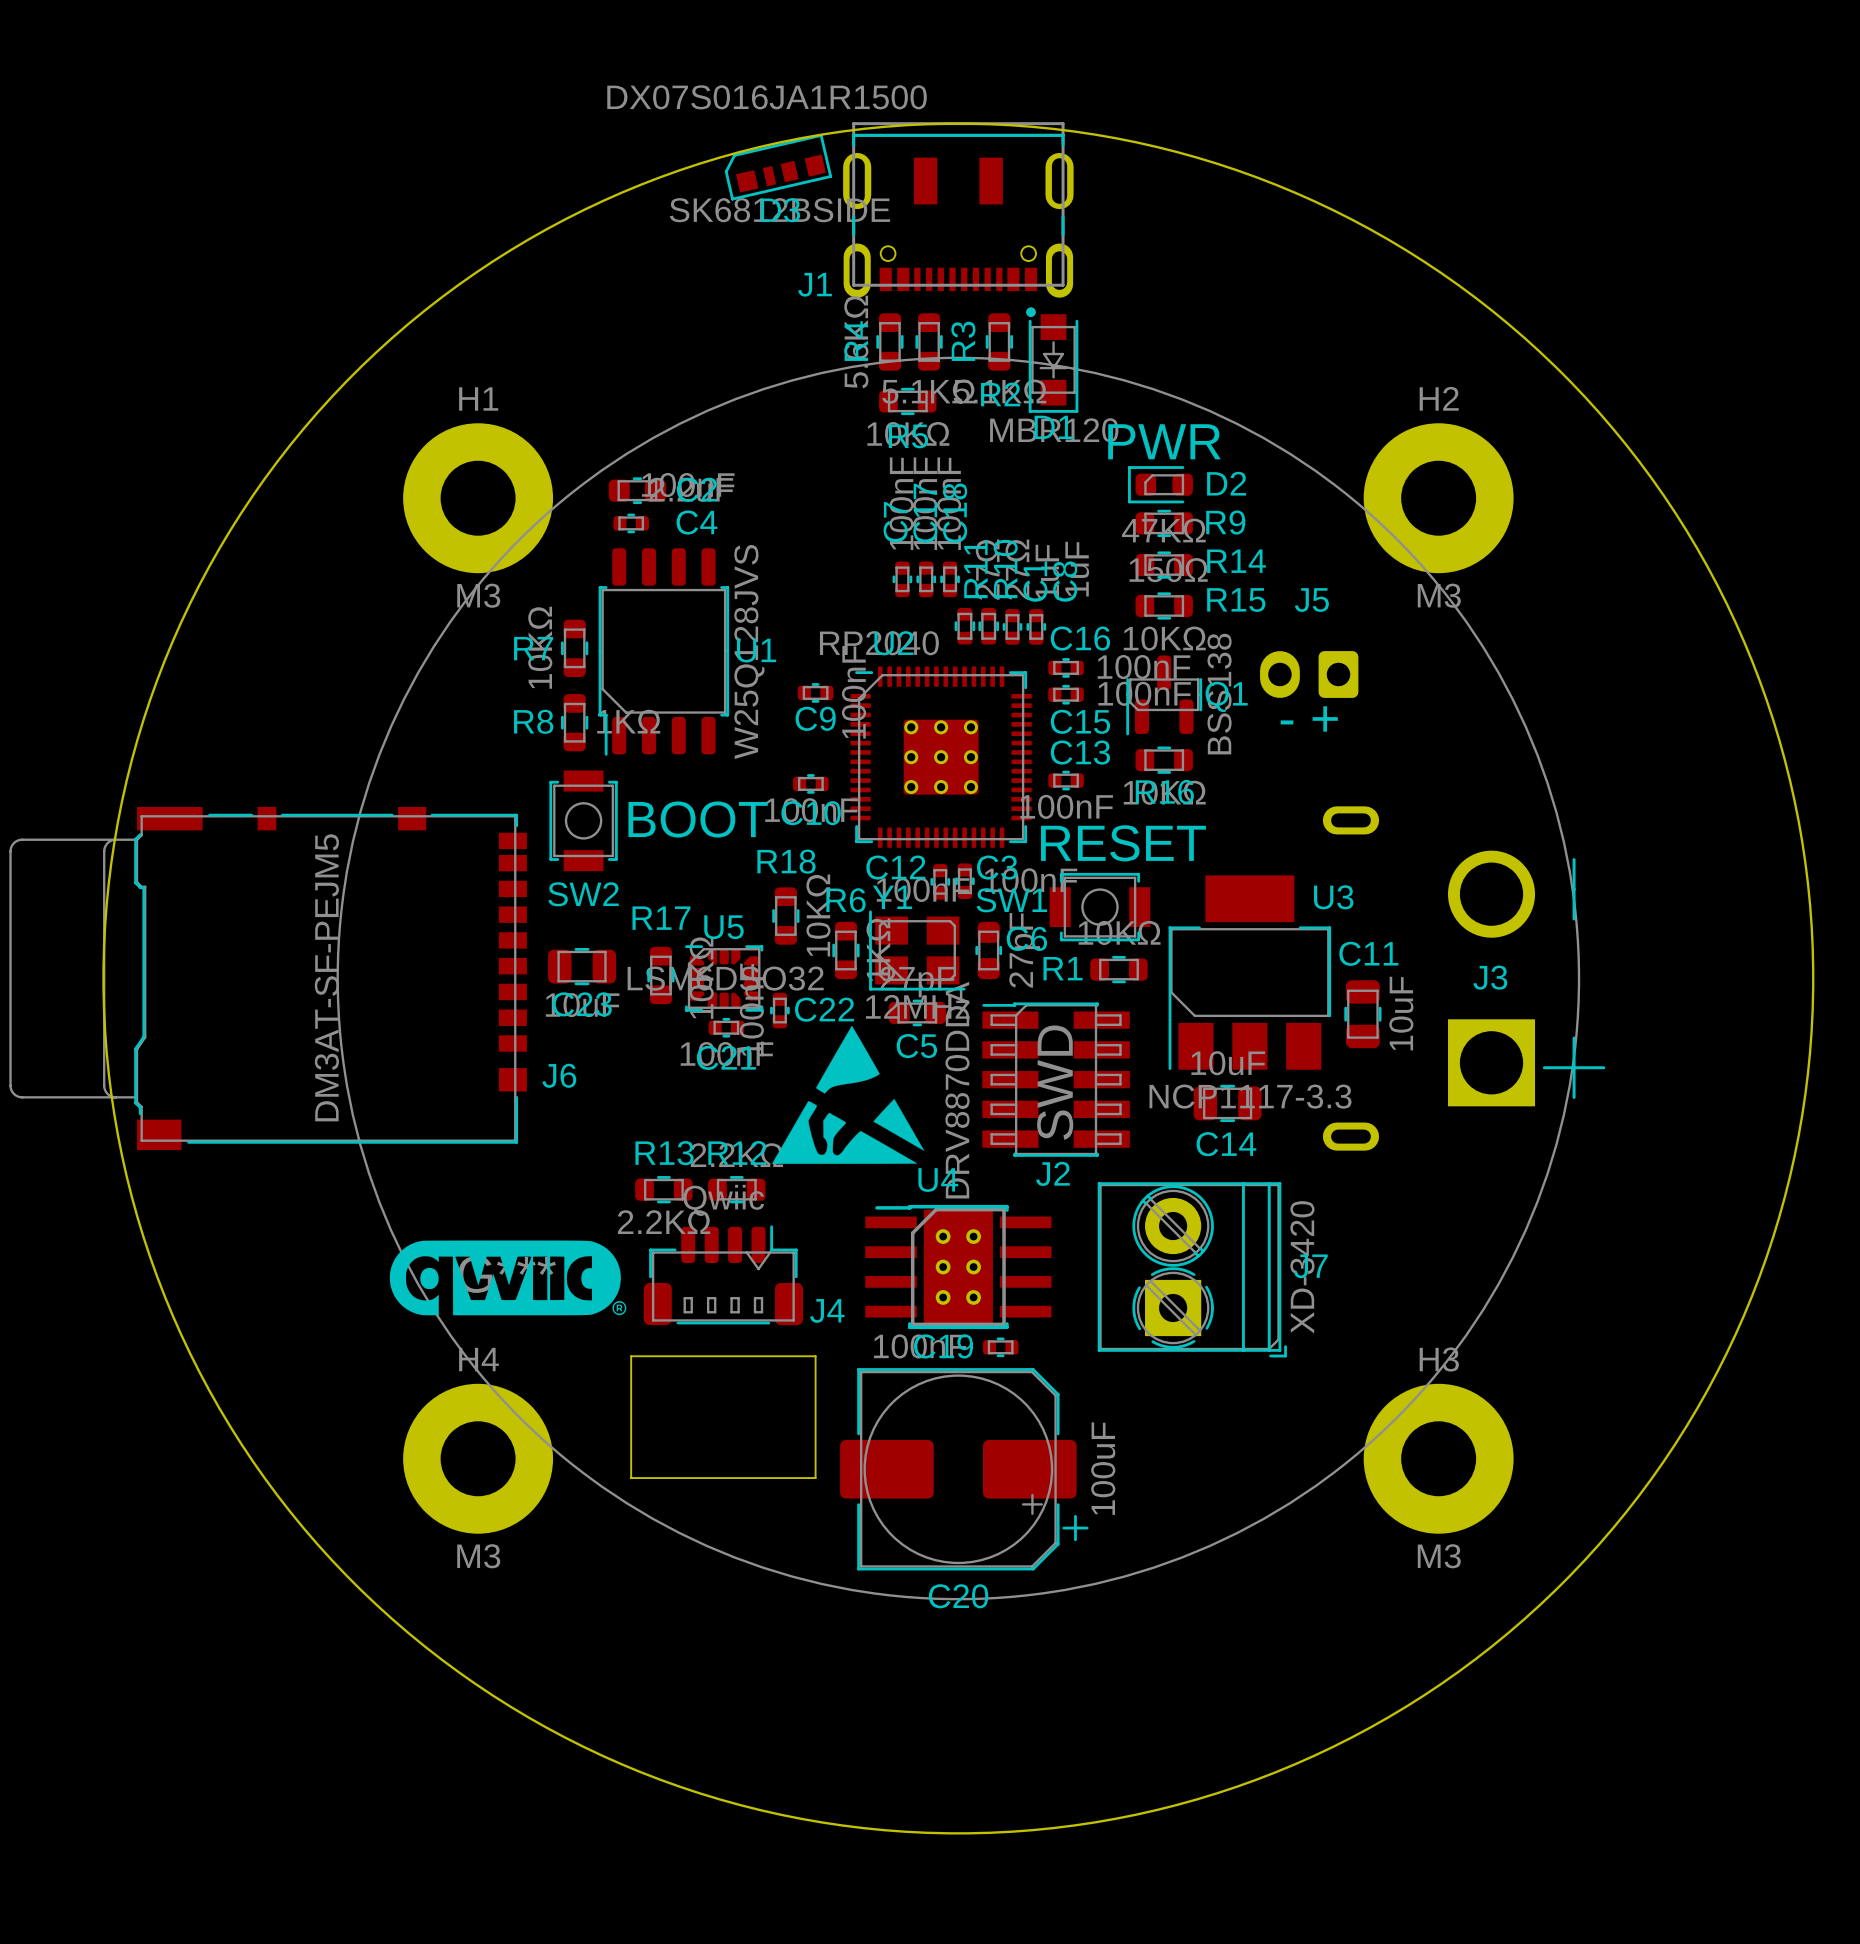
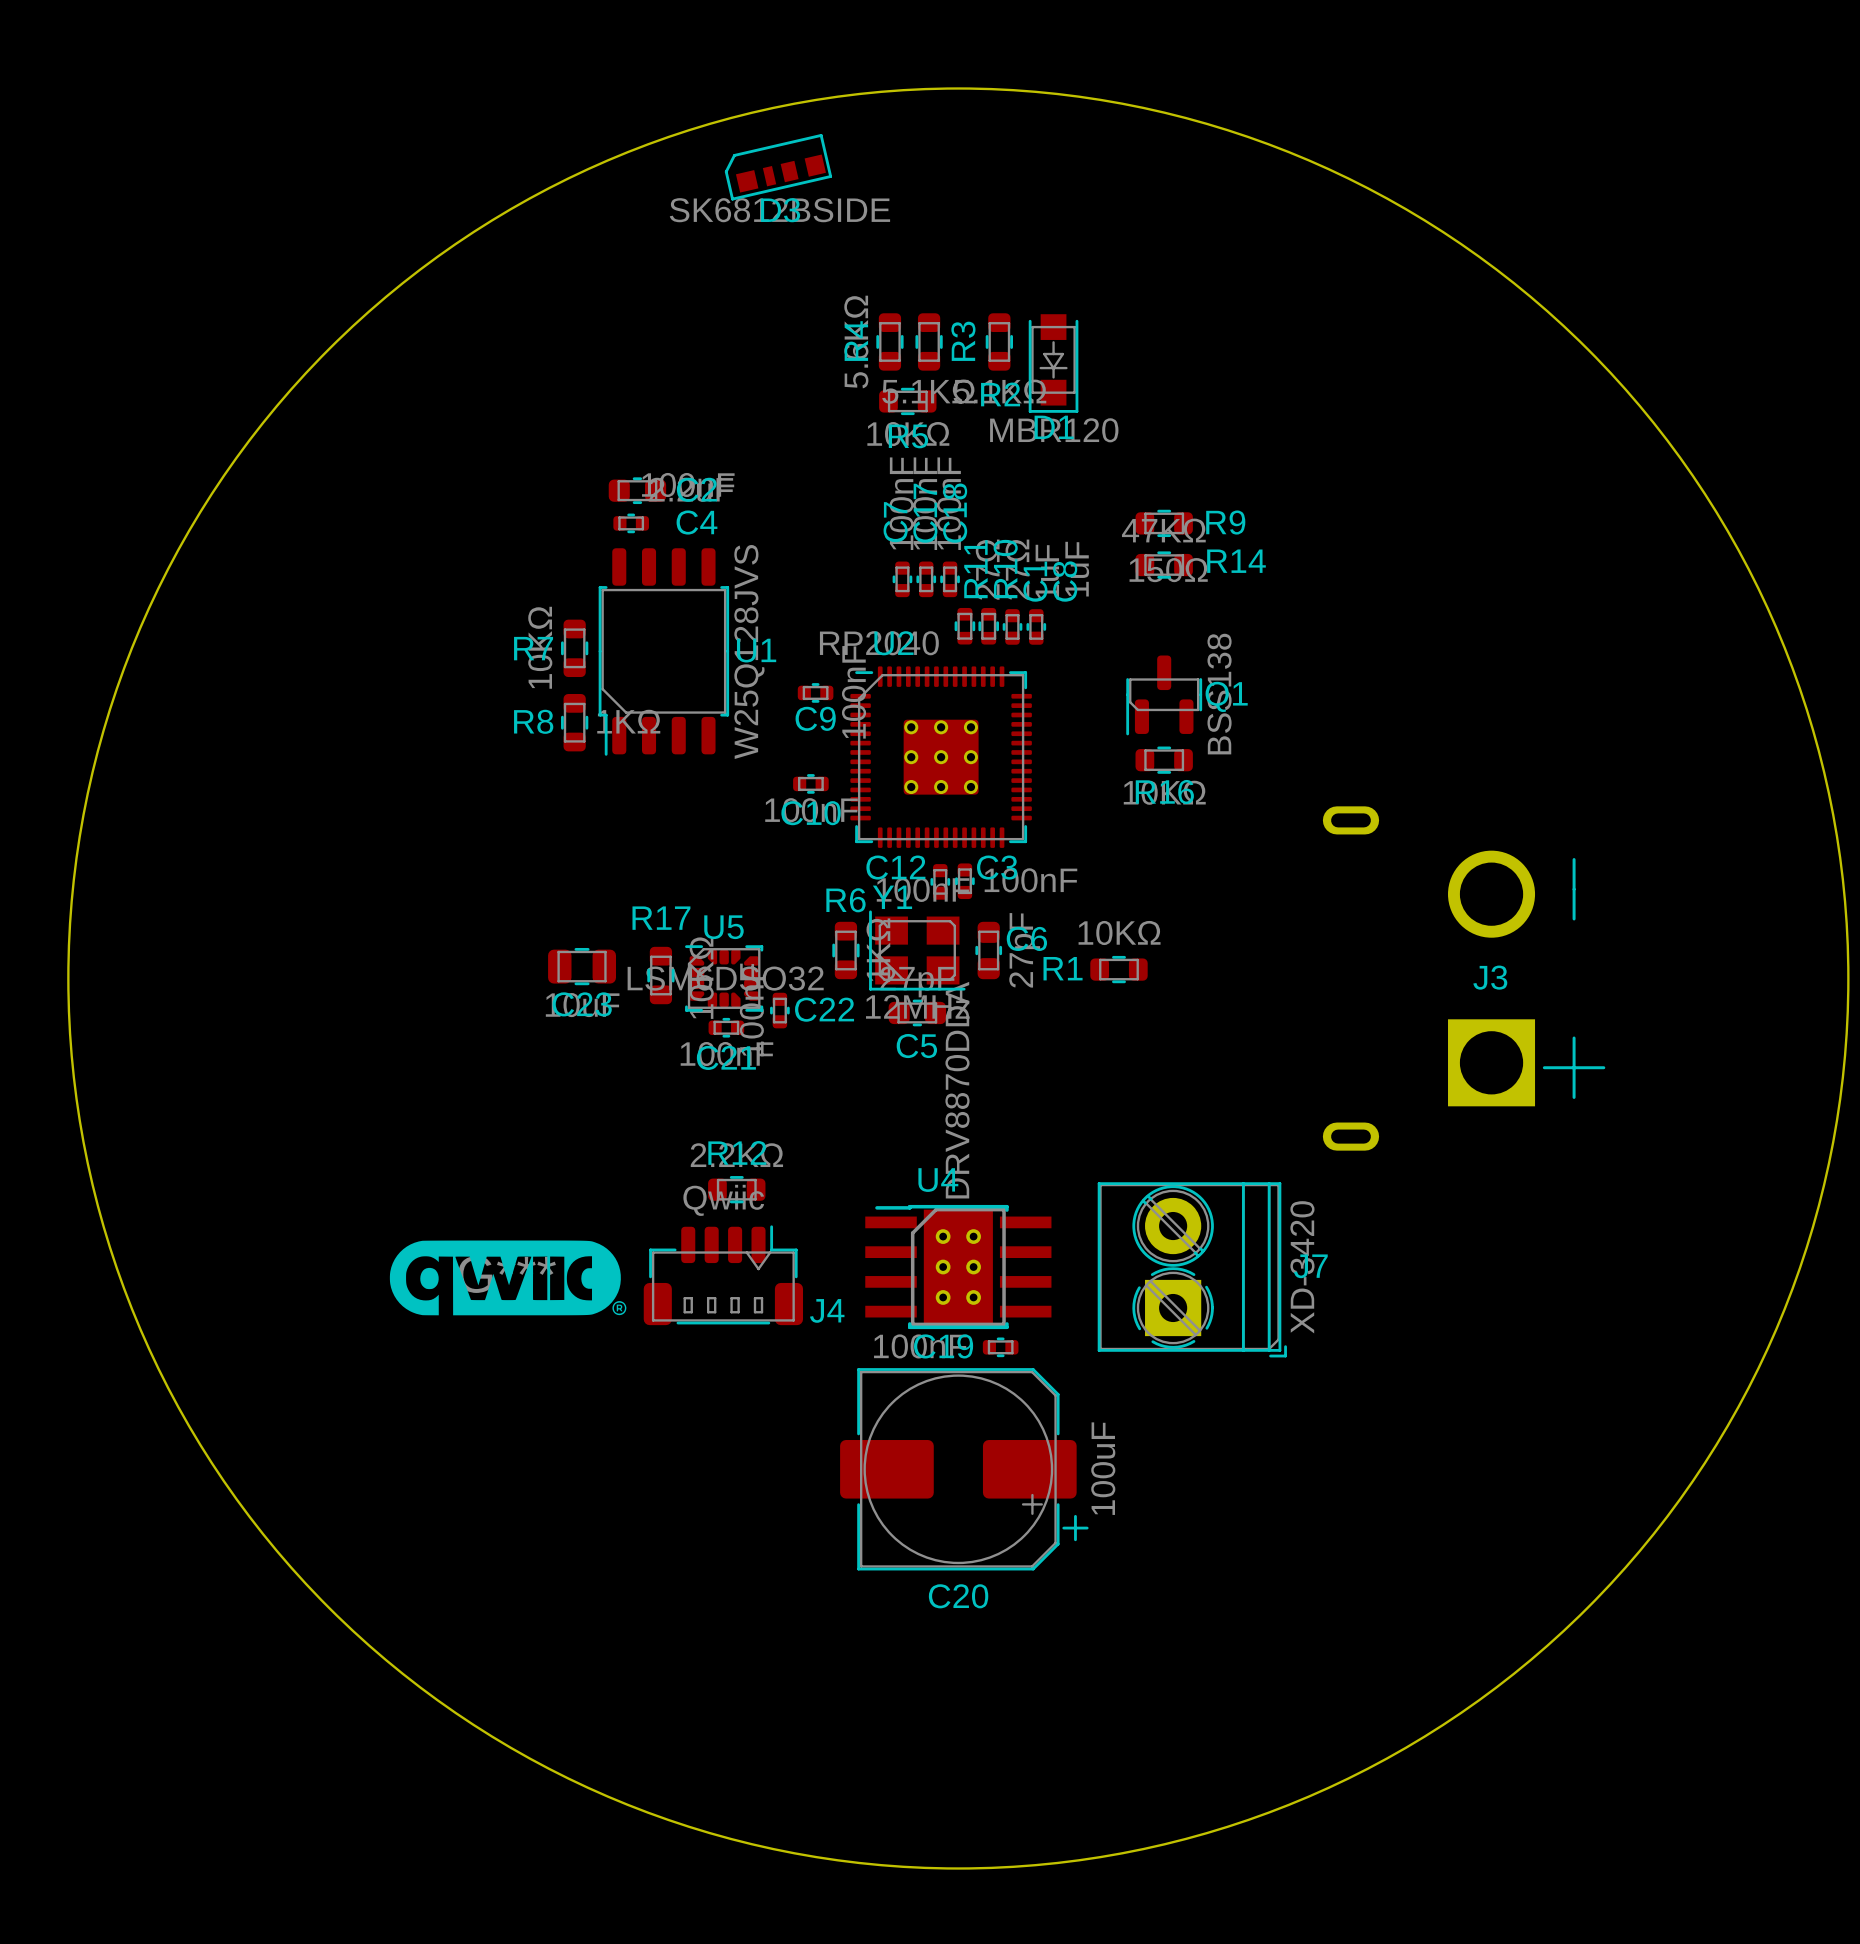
round board edge size: [102, 122, 1815, 1835] -> [67, 87, 1850, 1870]
J1: DX07S016JA1R1500 (958, 219) -> none
drawing: [336, 356, 1581, 1601] -> none
D2: PWR (1160, 484) -> none
H1: M3 (478, 498) -> none
H2: M3 (1438, 498) -> none
R15: 10KΩ (1164, 605) -> none
C16: 100nF (1066, 667) -> none
J5: (1309, 674) -> none
C15: 100nF (1066, 694) -> none
text: - + (1309, 718) -> none
C13: 100nF (1066, 780) -> none
SW2: BOOT (583, 820) -> none
SW1: RESET (1099, 907) -> none
R18: 10KΩ (785, 916) -> none
U3: NCP1117-3.3 (1249, 972) -> none
J6: DM3AT-SF-PEJM5 (268, 978) -> none
C11: 10uF (1362, 1014) -> none
J2: SWD (1056, 1079) -> none
C14: 10uF (1227, 1103) -> none
R13: 2.2KΩ (663, 1189) -> none
board edge: (631, 1356) (815, 1356) (815, 1478) (631, 1478) (631, 1356) -> none
H4: M3 (478, 1458) -> none
H3: M3 (1438, 1458) -> none

